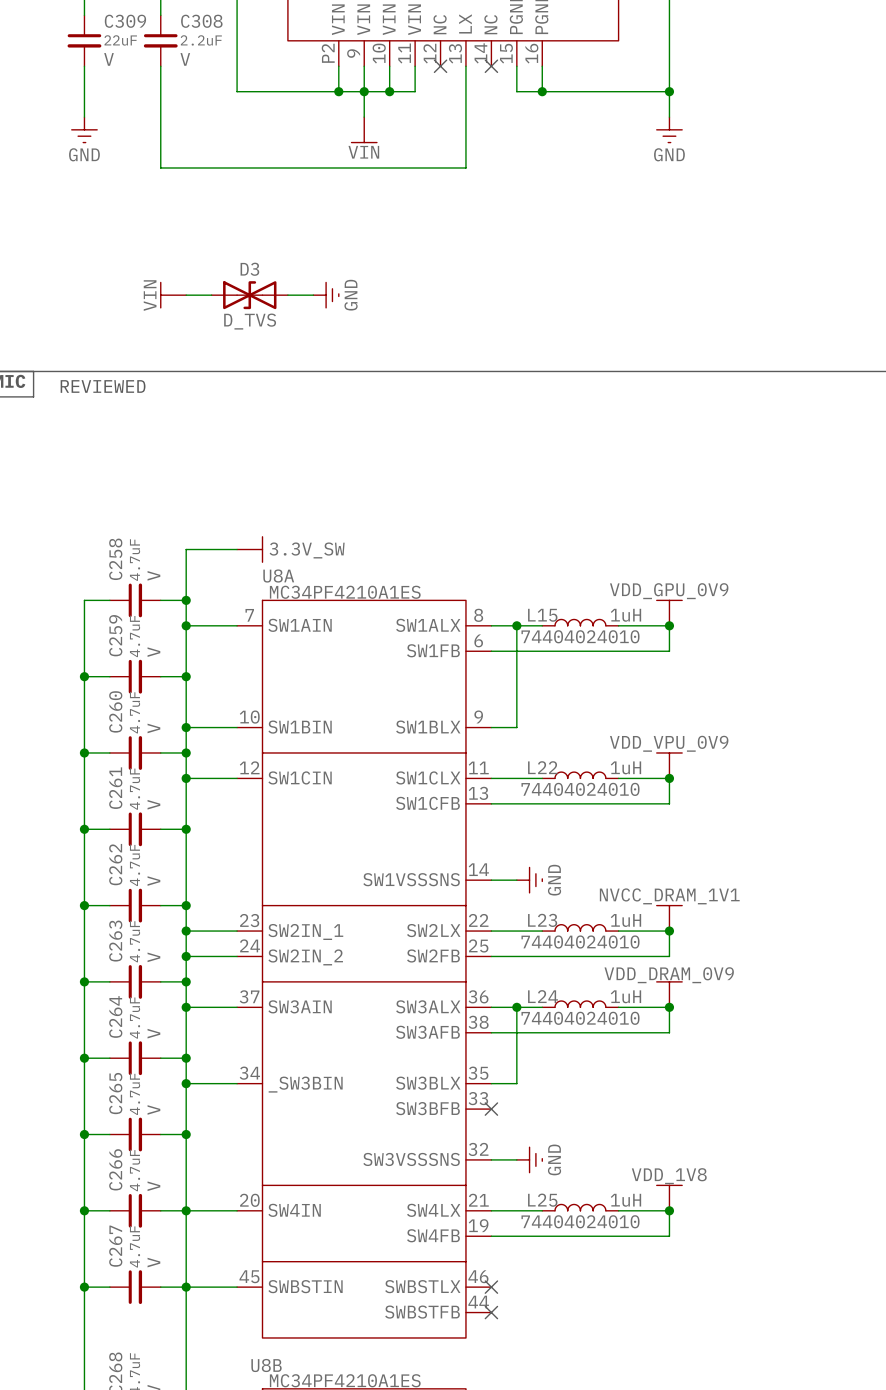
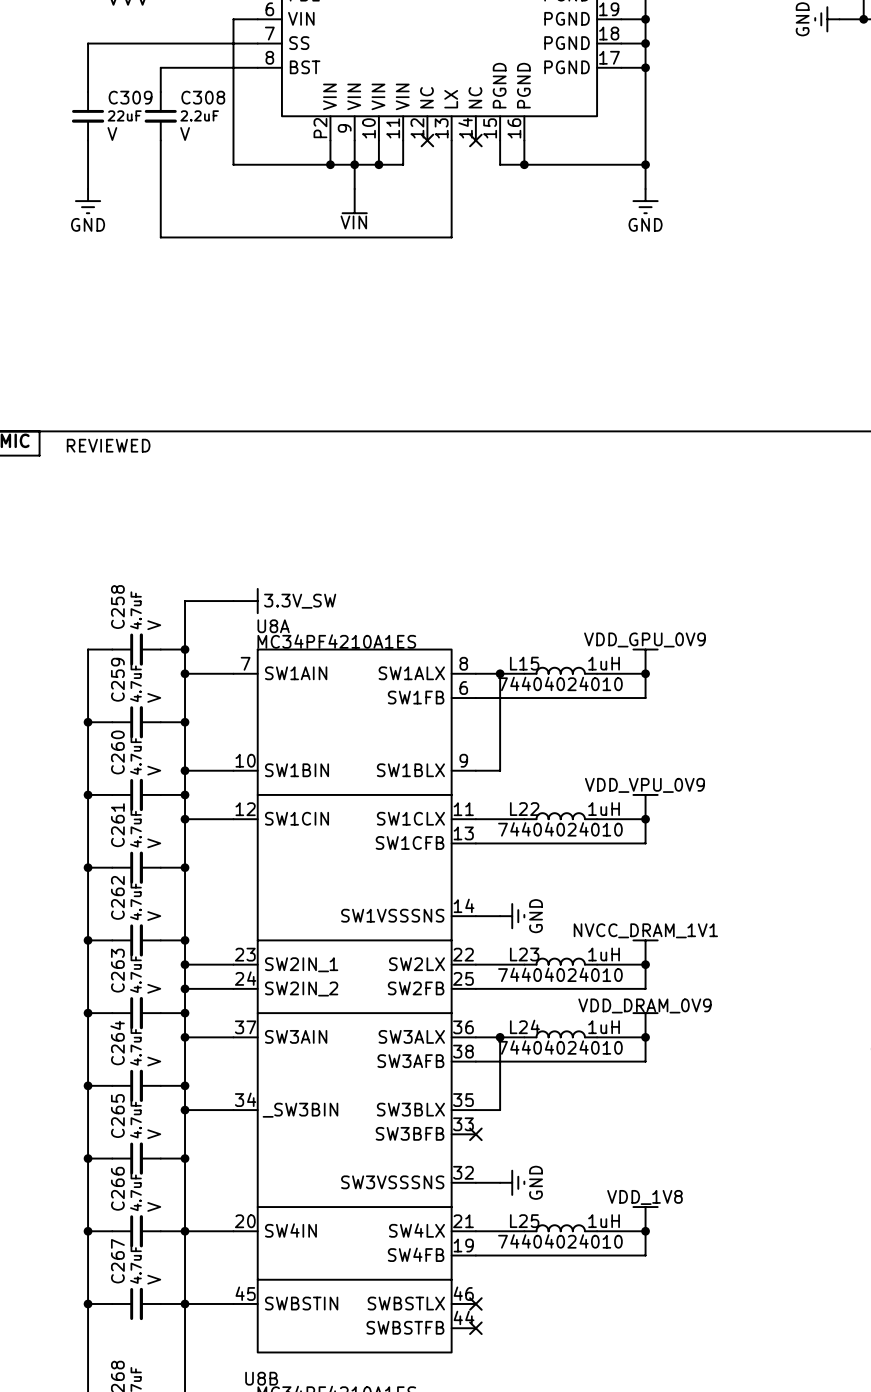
power symbol: VIN (173, 295) -> none
wire: (186, 295) (211, 295) -> none
D3: D_TVS (249, 295) -> none
wire: (287, 295) (313, 295) -> none
power symbol: GND (326, 295) -> none

